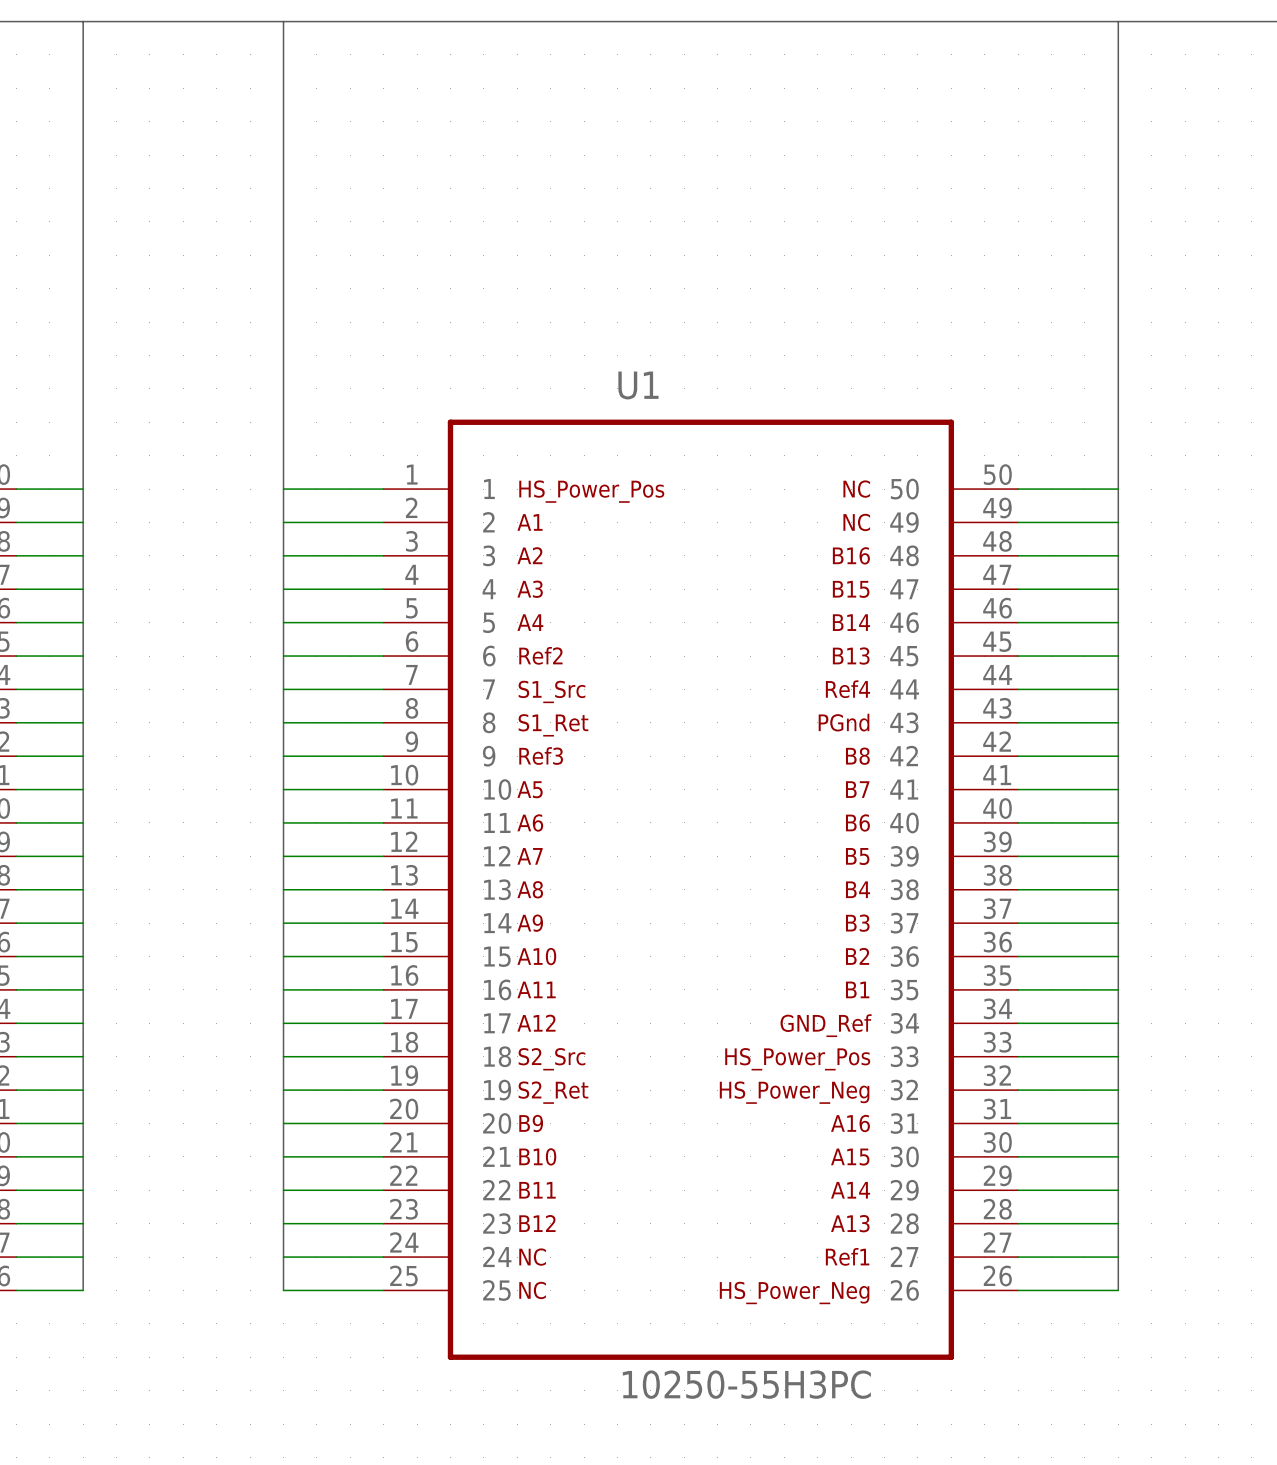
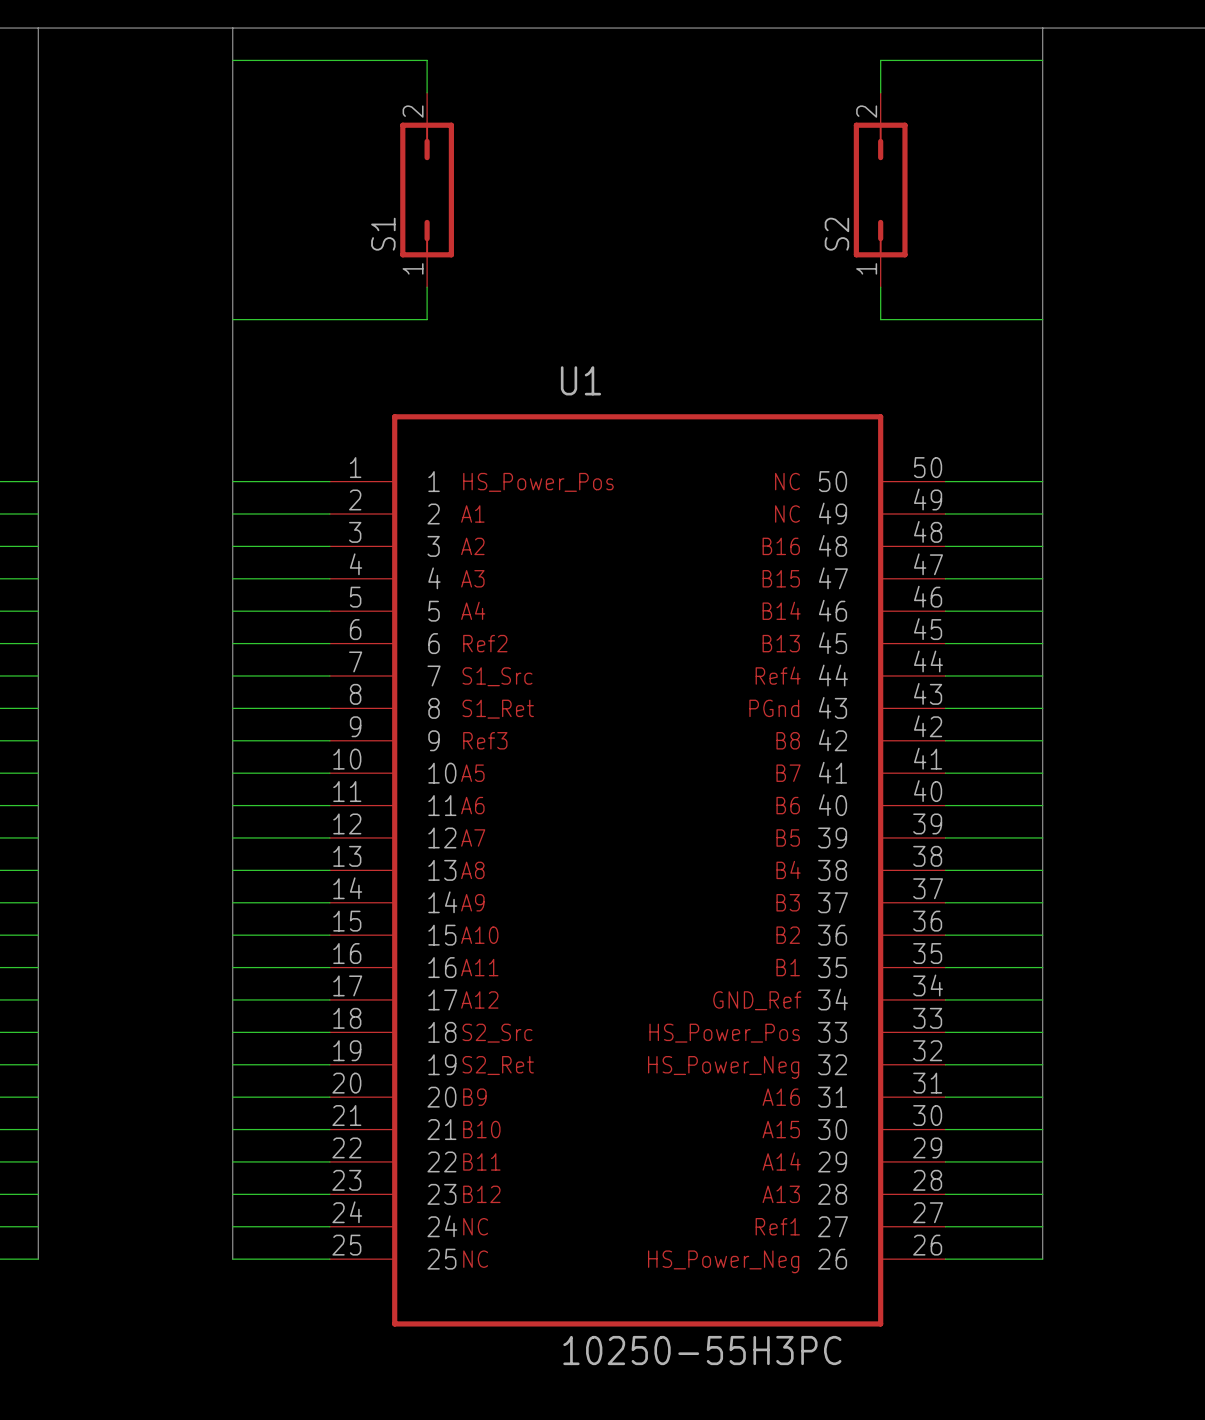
wire: none -> (232, 60) (427, 60) (427, 92)
wire: none -> (1042, 60) (880, 60) (880, 92)
S1: none -> (427, 190)
S2: none -> (880, 190)
wire: none -> (427, 287) (427, 319) (232, 319)
wire: none -> (880, 287) (880, 319) (1042, 319)

